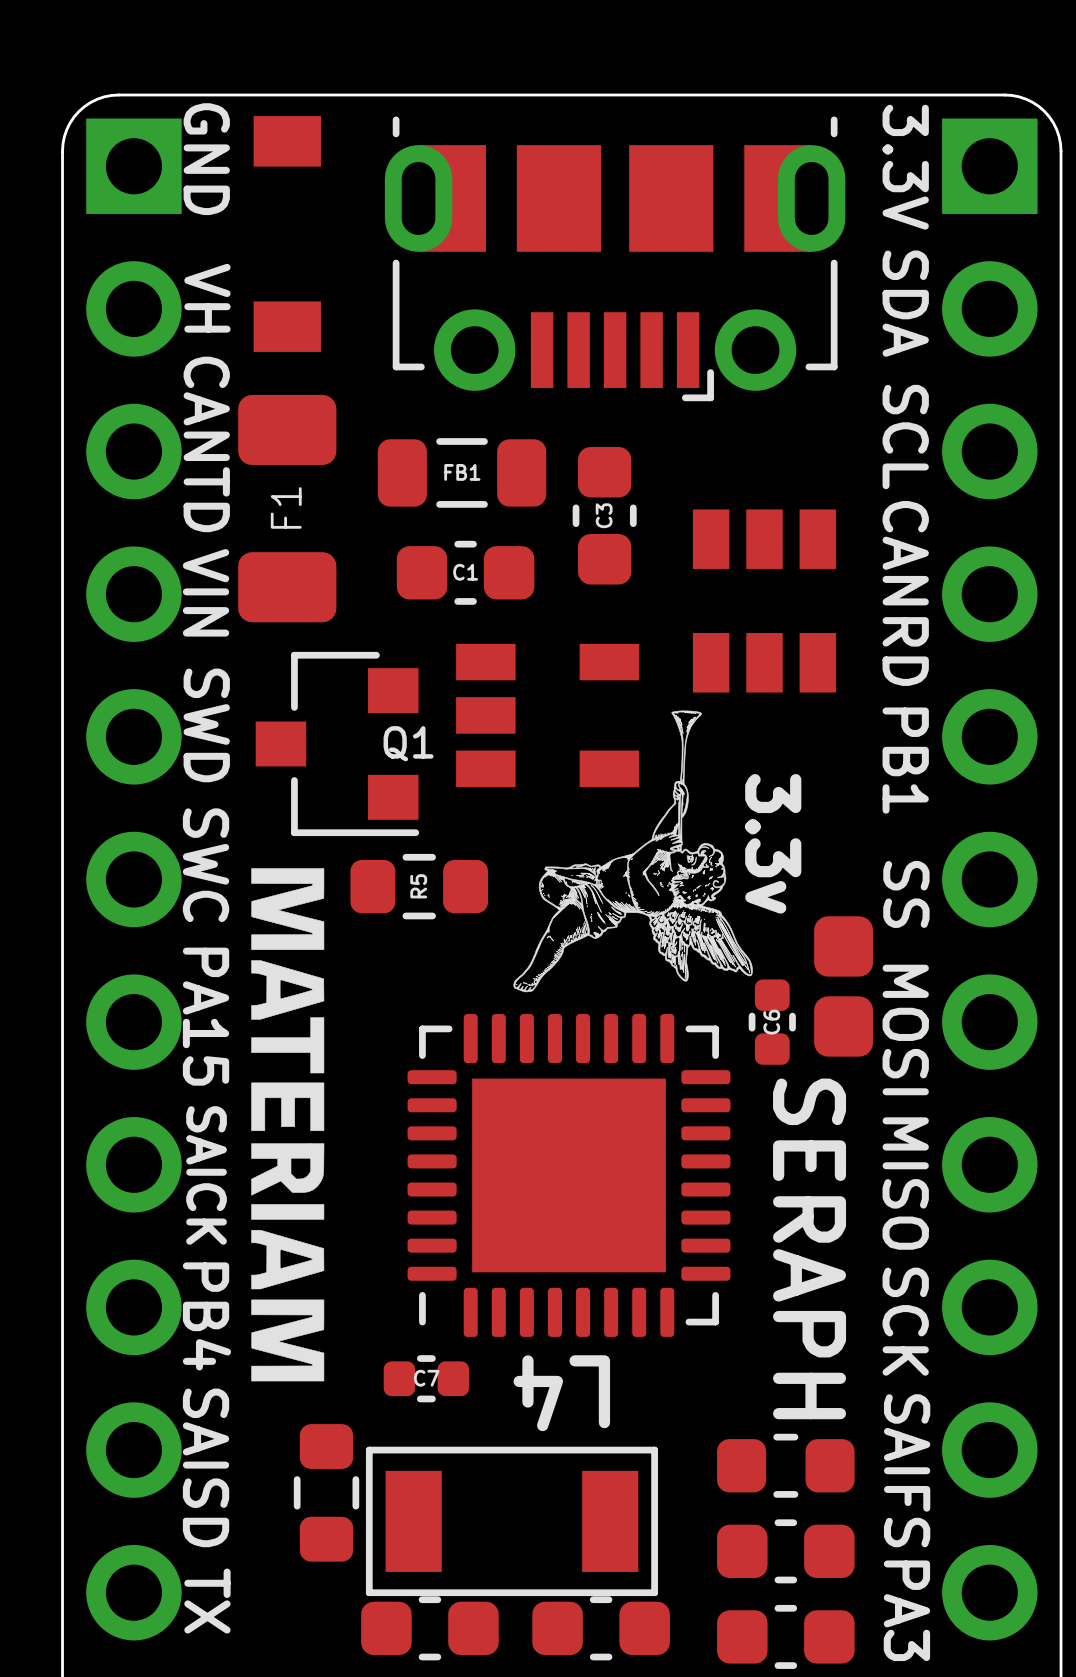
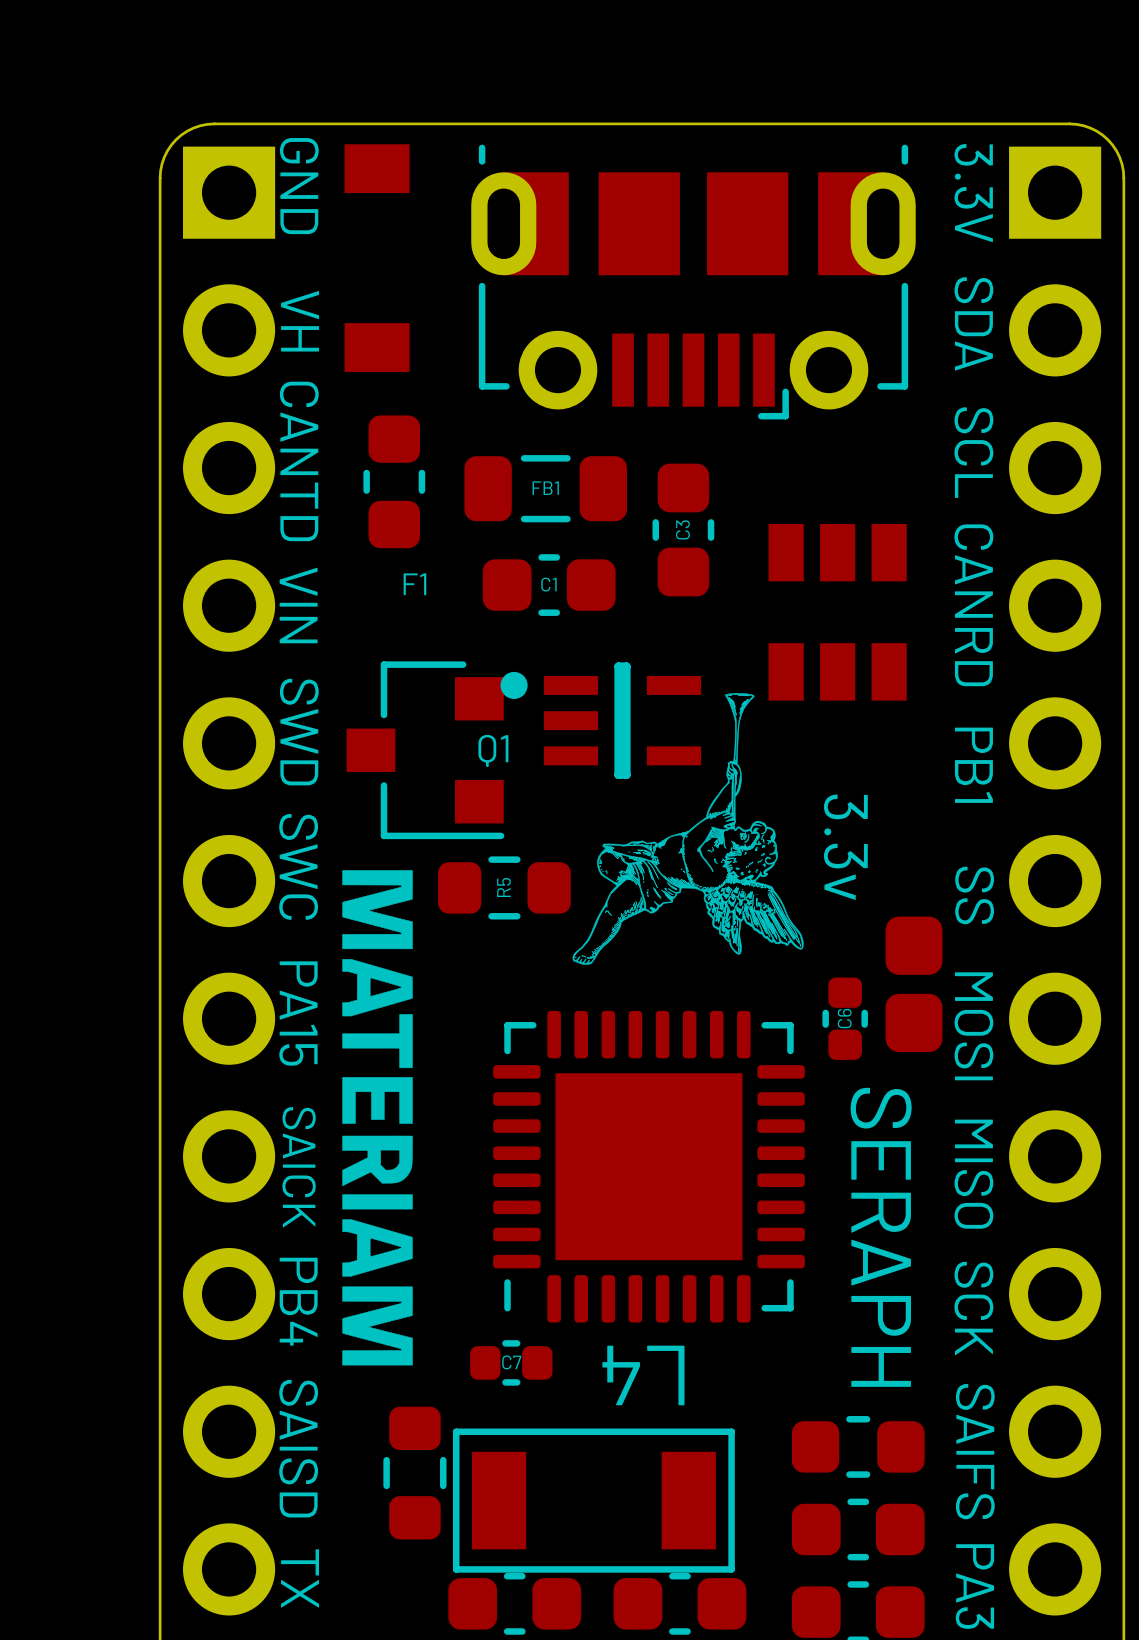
F1 footprint: [238, 394, 337, 623] -> [363, 415, 426, 549]
part footprint: [456, 643, 640, 788] -> [500, 662, 702, 779]
drawing position: (633, 851) -> (688, 828)

